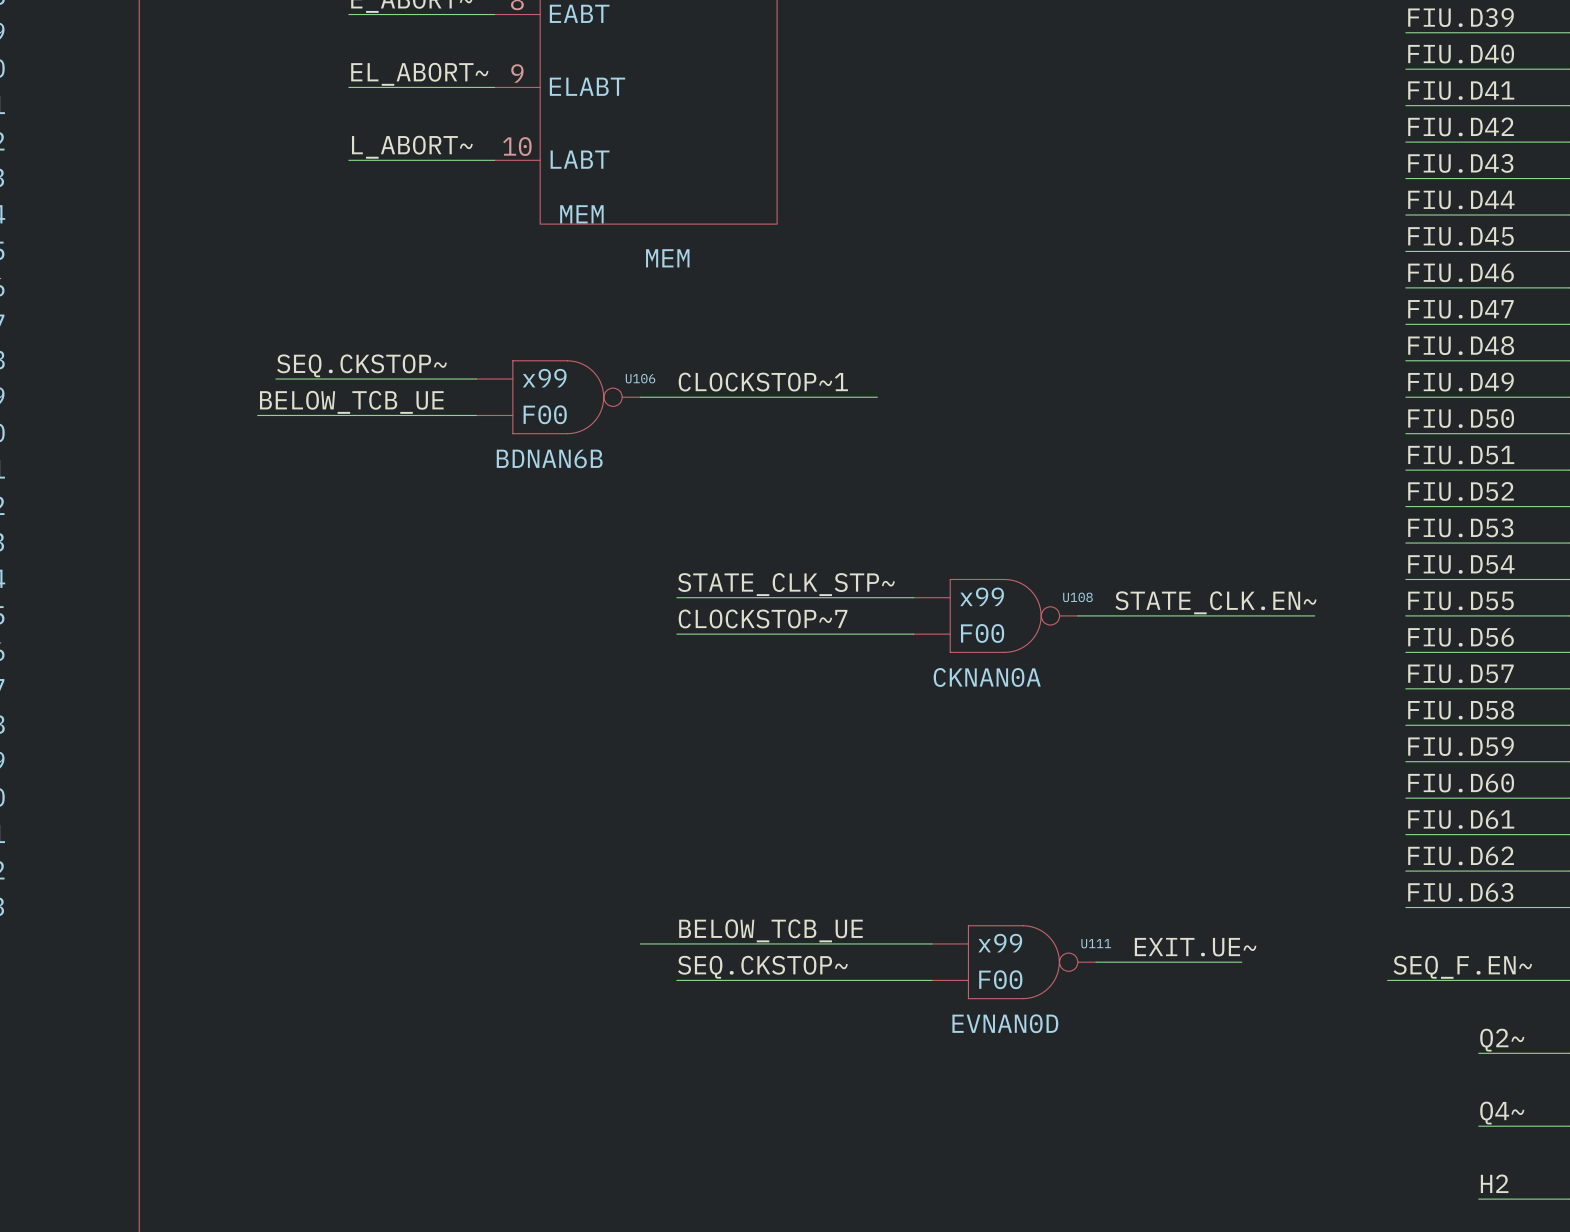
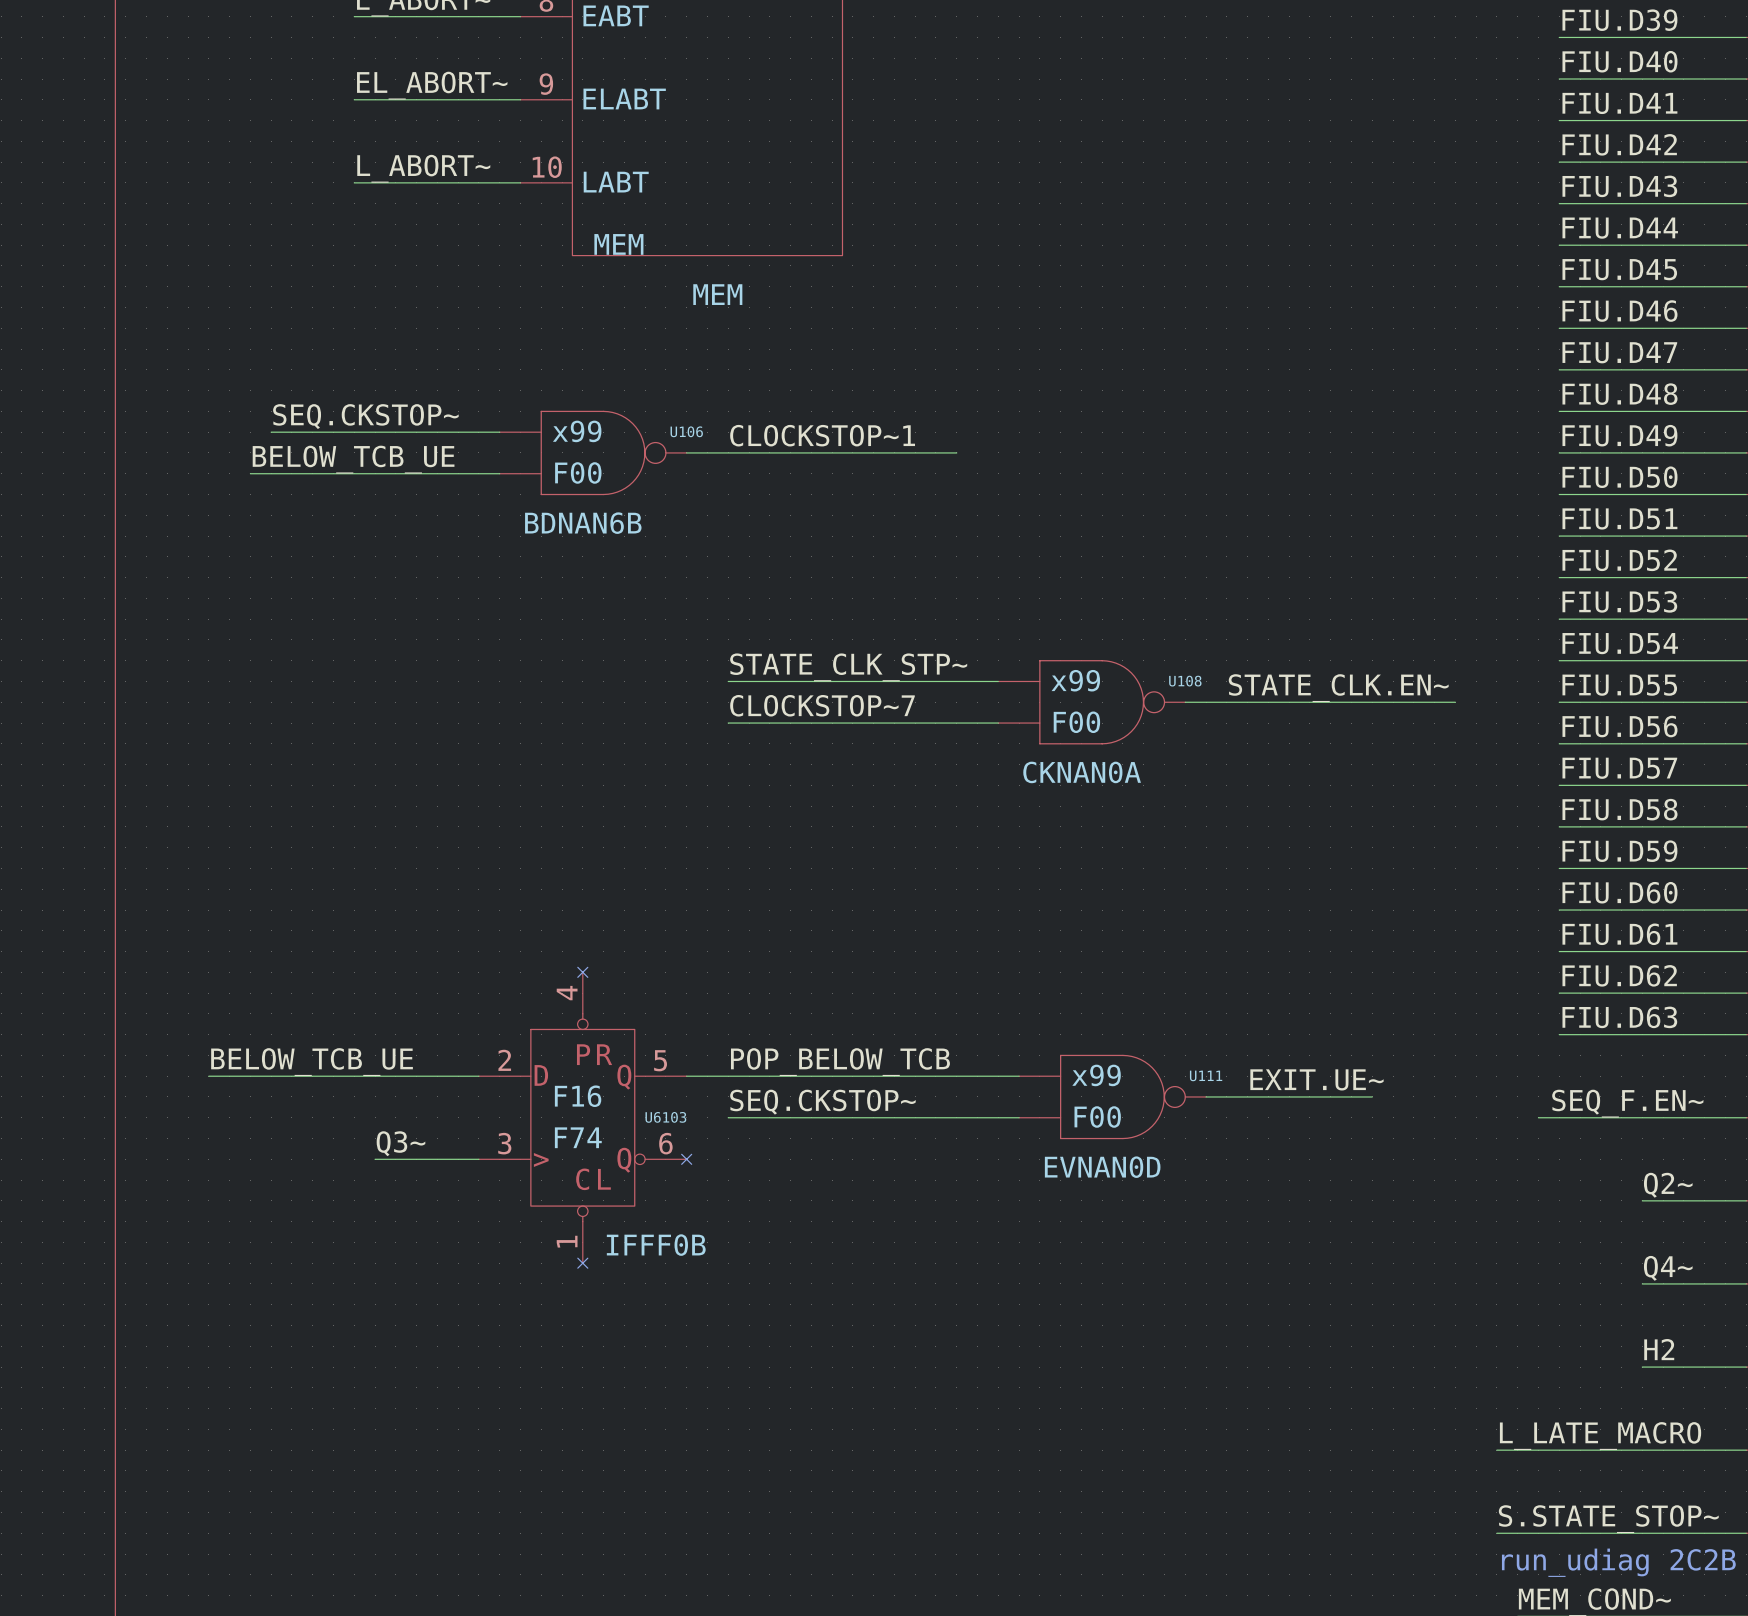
no-connect mark: none -> (582, 972)
label: none -> BELOW_TCB_UE (312, 1062)
label: BELOW_TCB_UE (770, 930) -> POP_BELOW_TCB (840, 1062)
wire: none -> (208, 1076) (478, 1076)
U6103: none -> F74 (582, 1117)
label: none -> Q3~ (400, 1143)
wire: none -> (375, 1159) (478, 1159)
no-connect mark: none -> (686, 1159)
no-connect mark: none -> (582, 1263)

